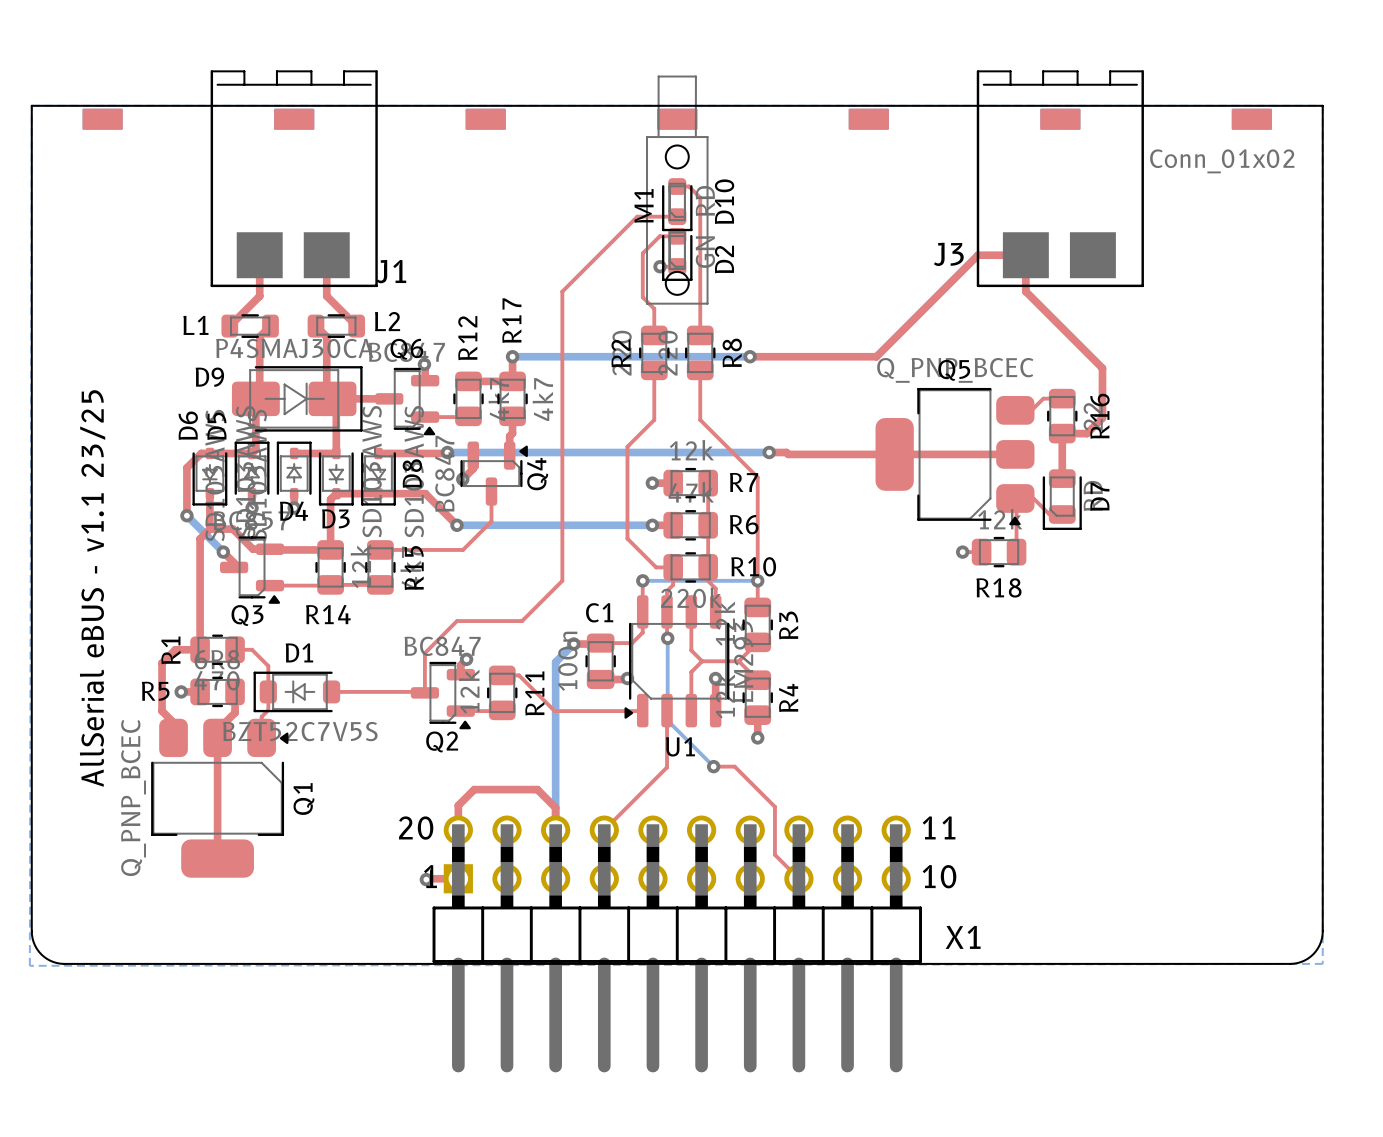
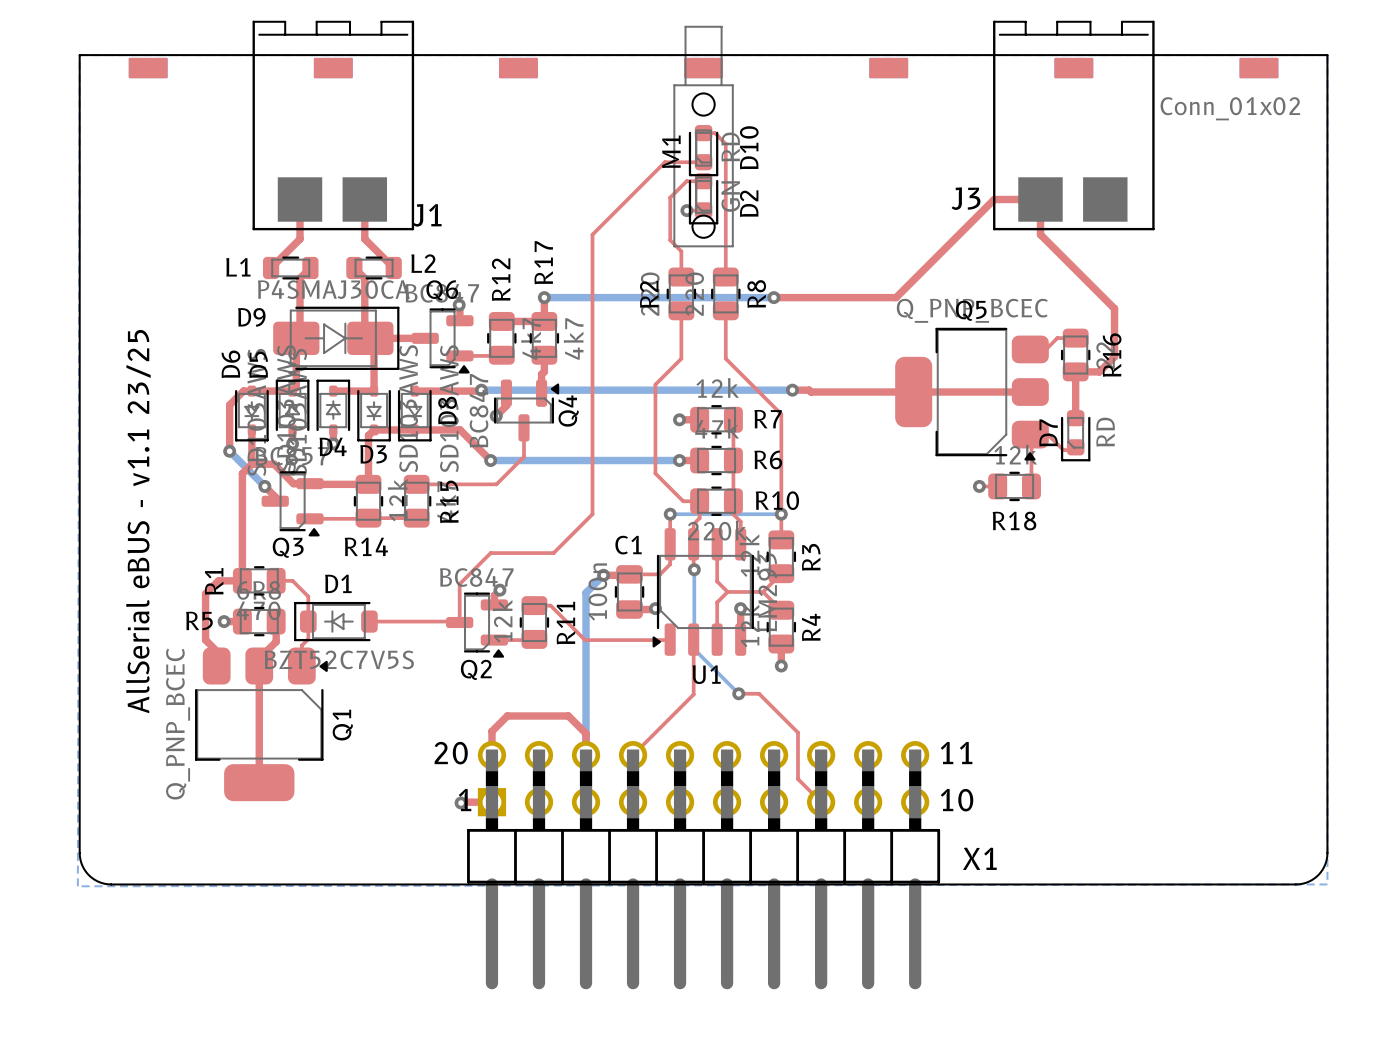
D7 footprint: [1042, 469, 1082, 530] -> [1060, 410, 1091, 462]
D7 name position: D7 (1099, 496) -> D7 (1048, 432)

